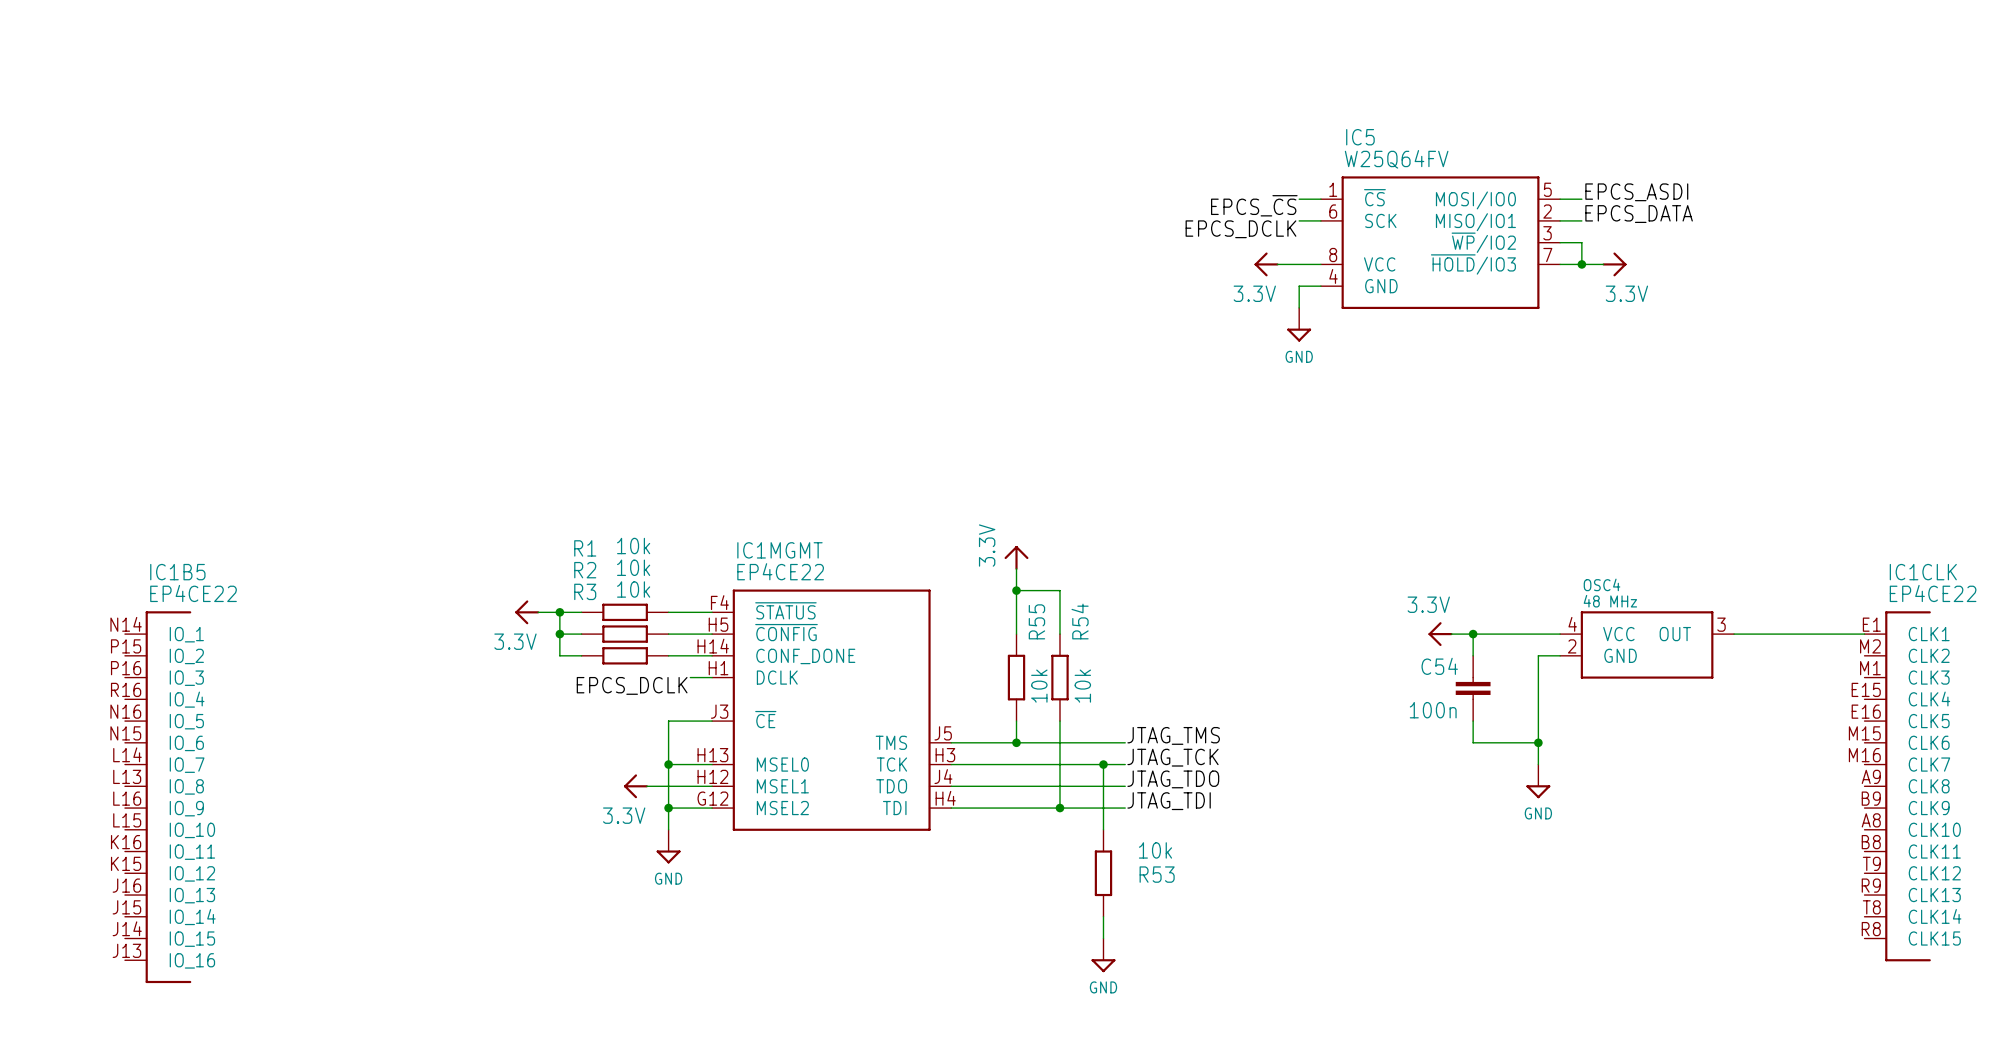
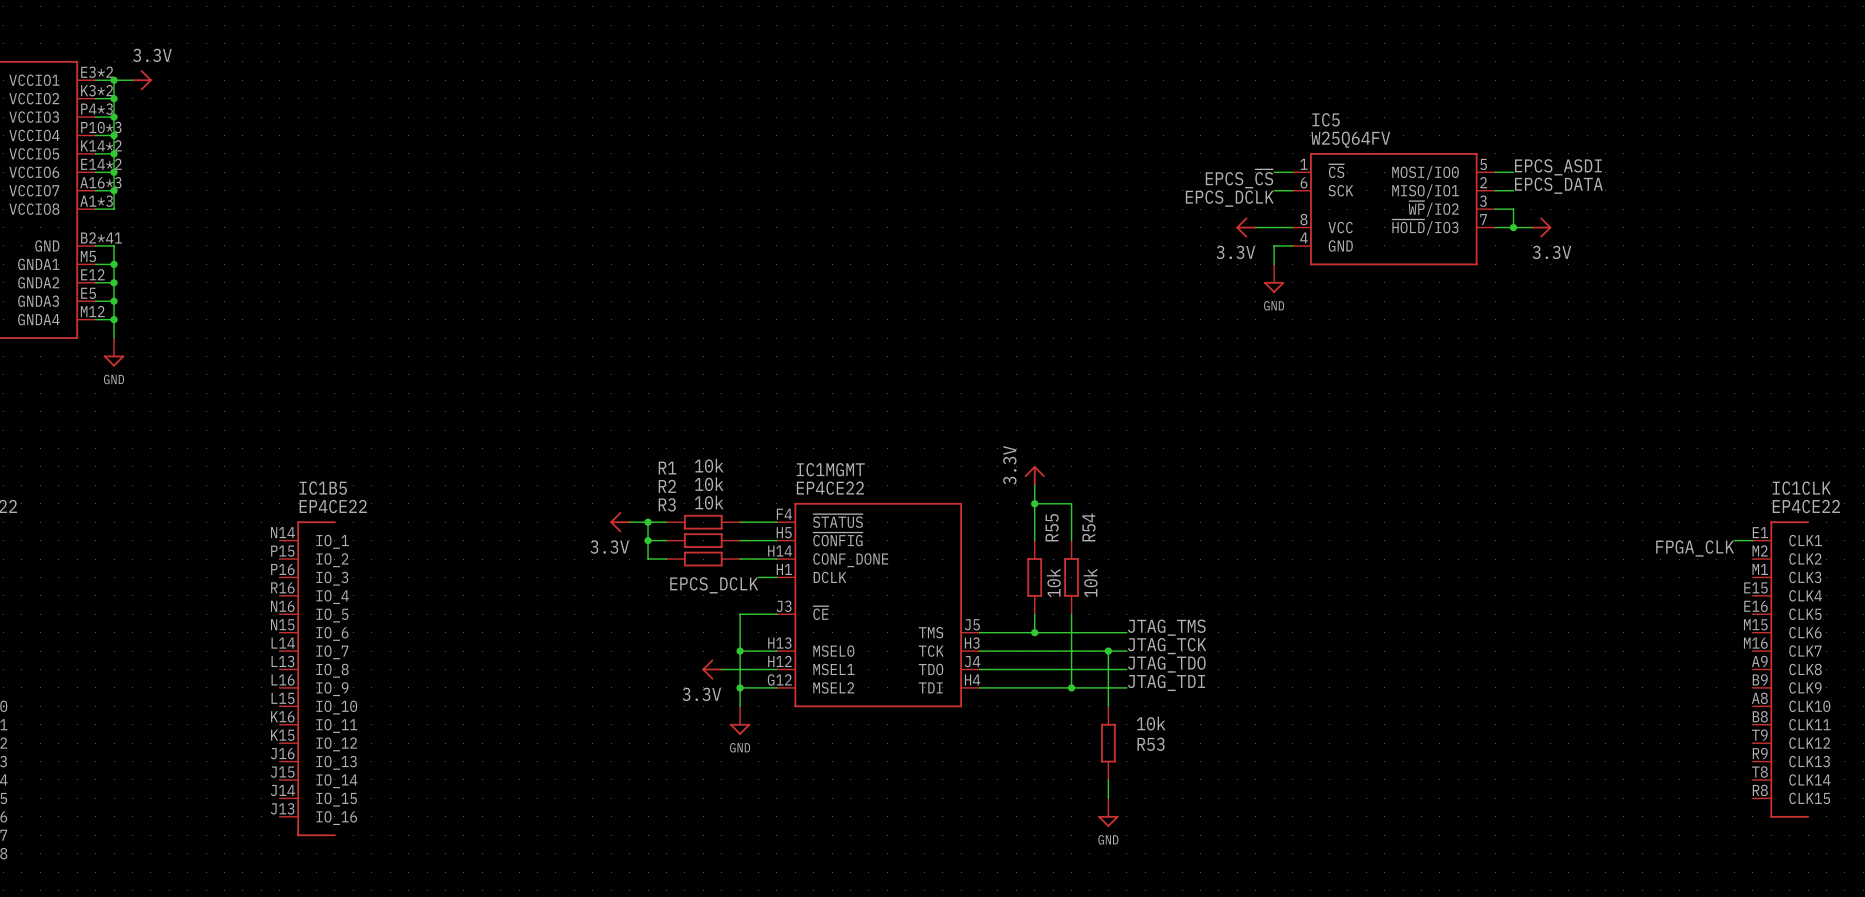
power symbol: 3.3V (1440, 634) -> none
wire: (1451, 634) (1560, 634) -> none
wire: (1473, 634) (1473, 655) -> none
junction: (1473, 634) -> none
wire: (1734, 634) (1842, 634) -> none
label: none -> FPGA_CLK (1695, 548)
OSC4: 48 MHz (1647, 644) -> none
wire: (1560, 655) (1538, 655) (1538, 764) -> none
C54: 100n (1473, 688) -> none
wire: (1473, 721) (1473, 742) (1538, 742) -> none
junction: (1538, 742) -> none
power symbol: GND (1538, 781) -> none

